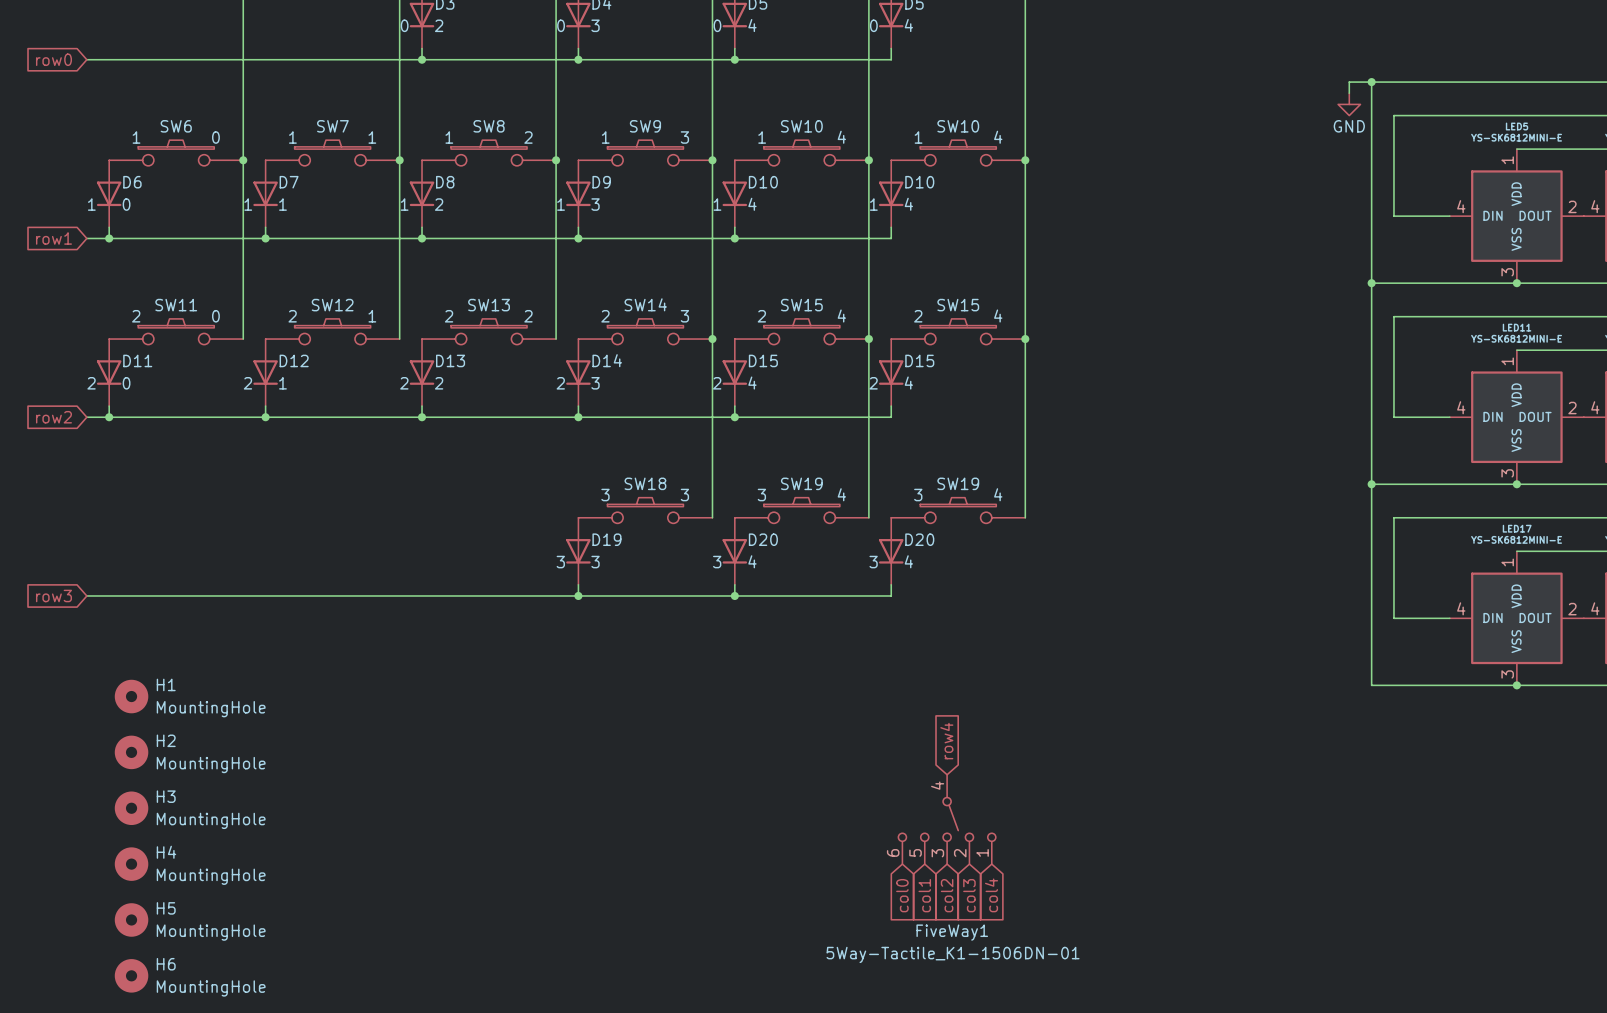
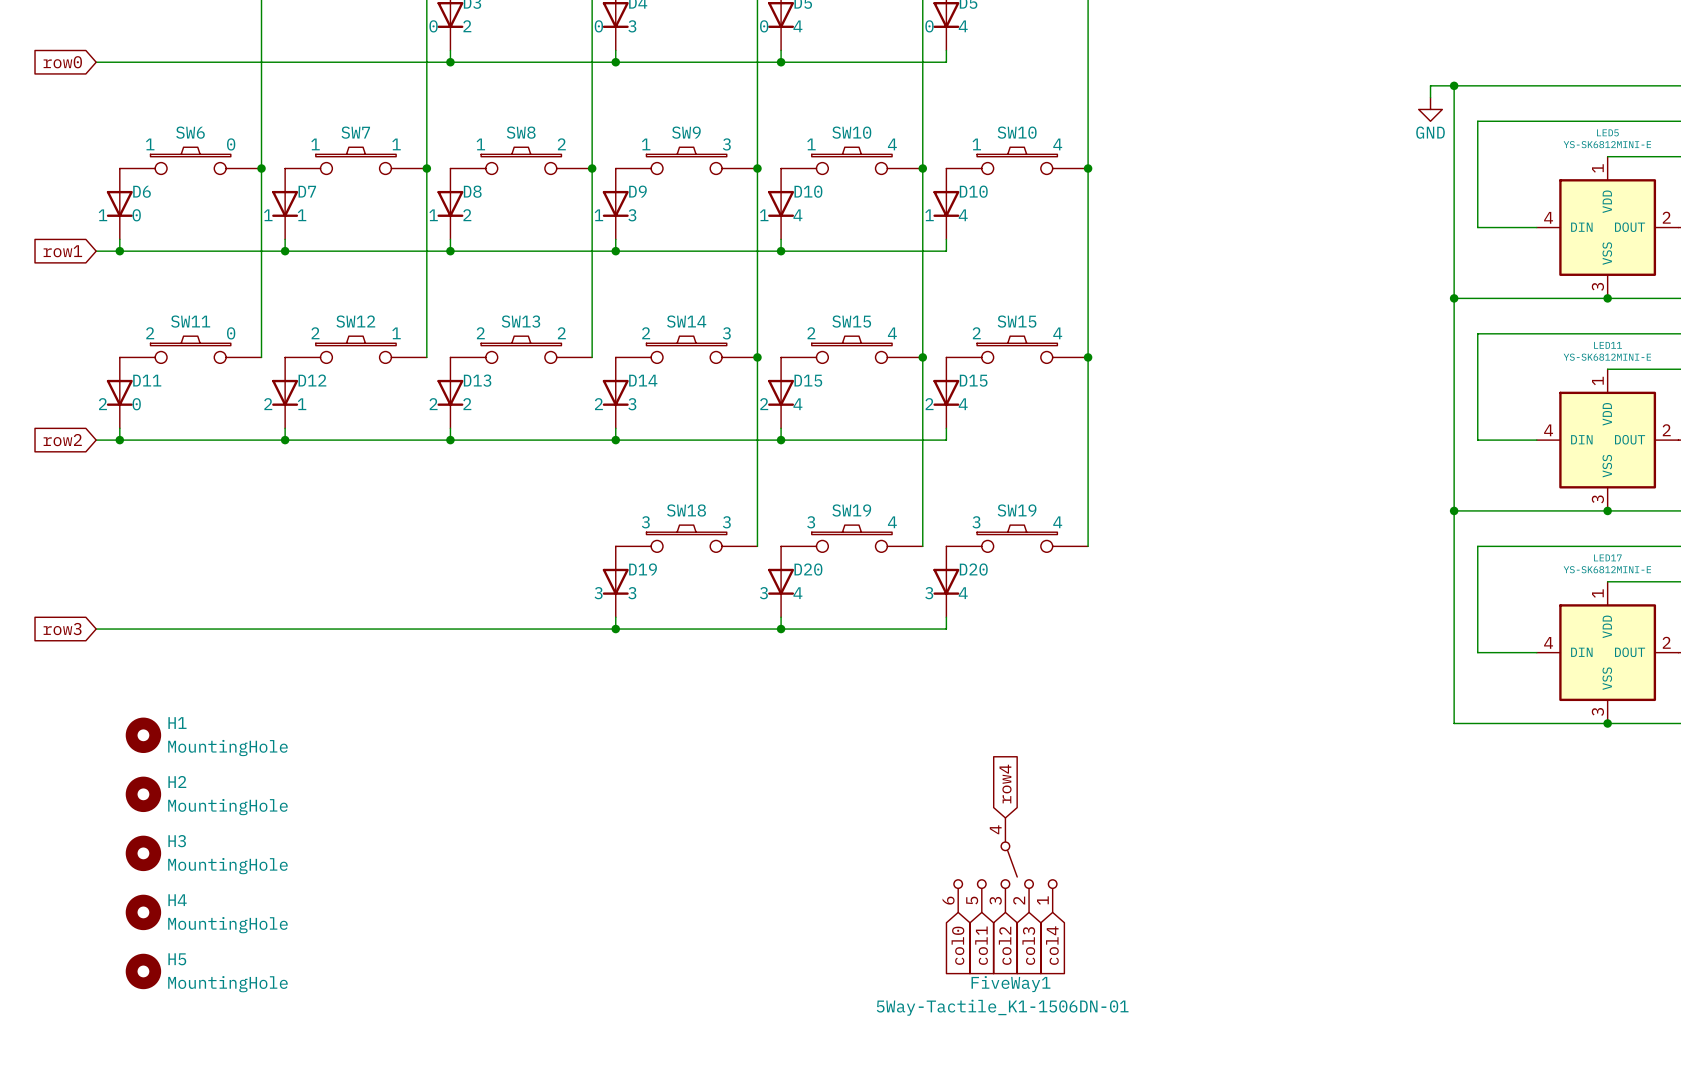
H6: MountingHole (131, 975) -> none

